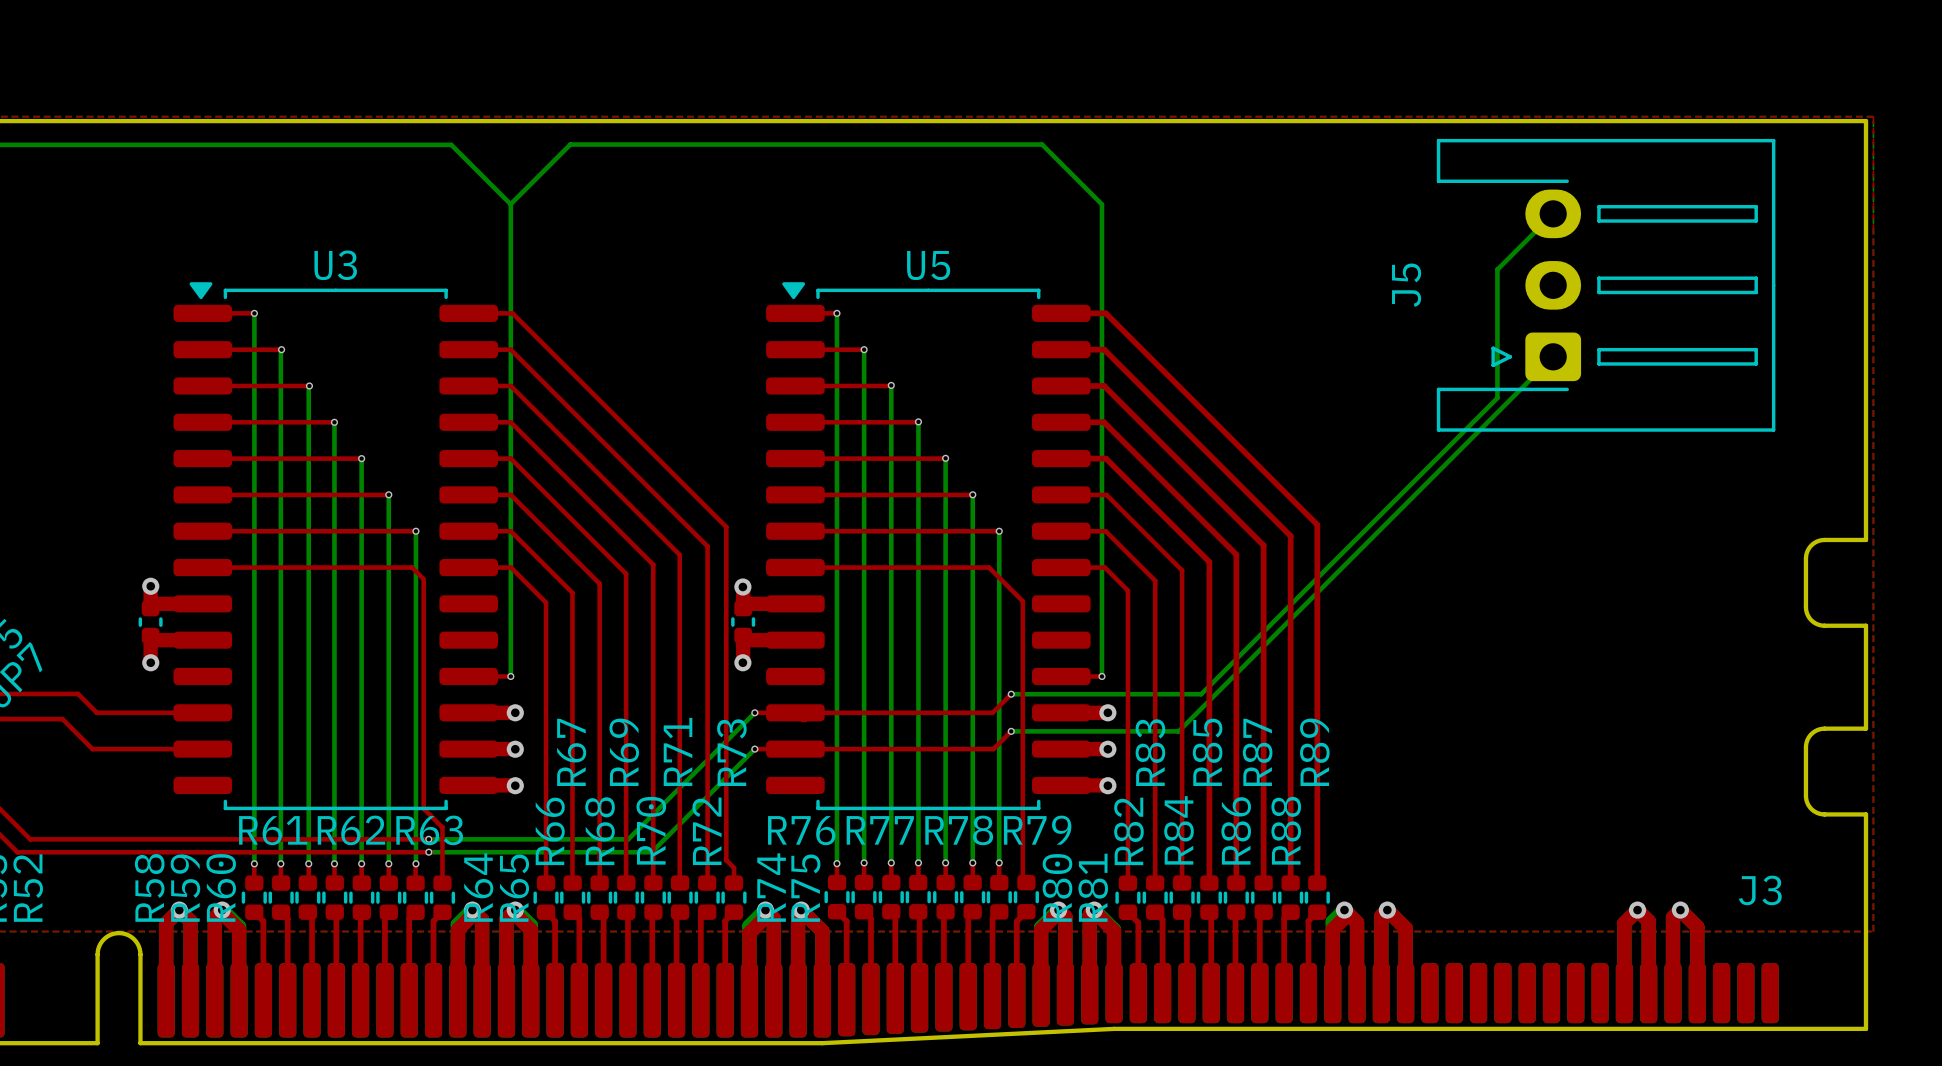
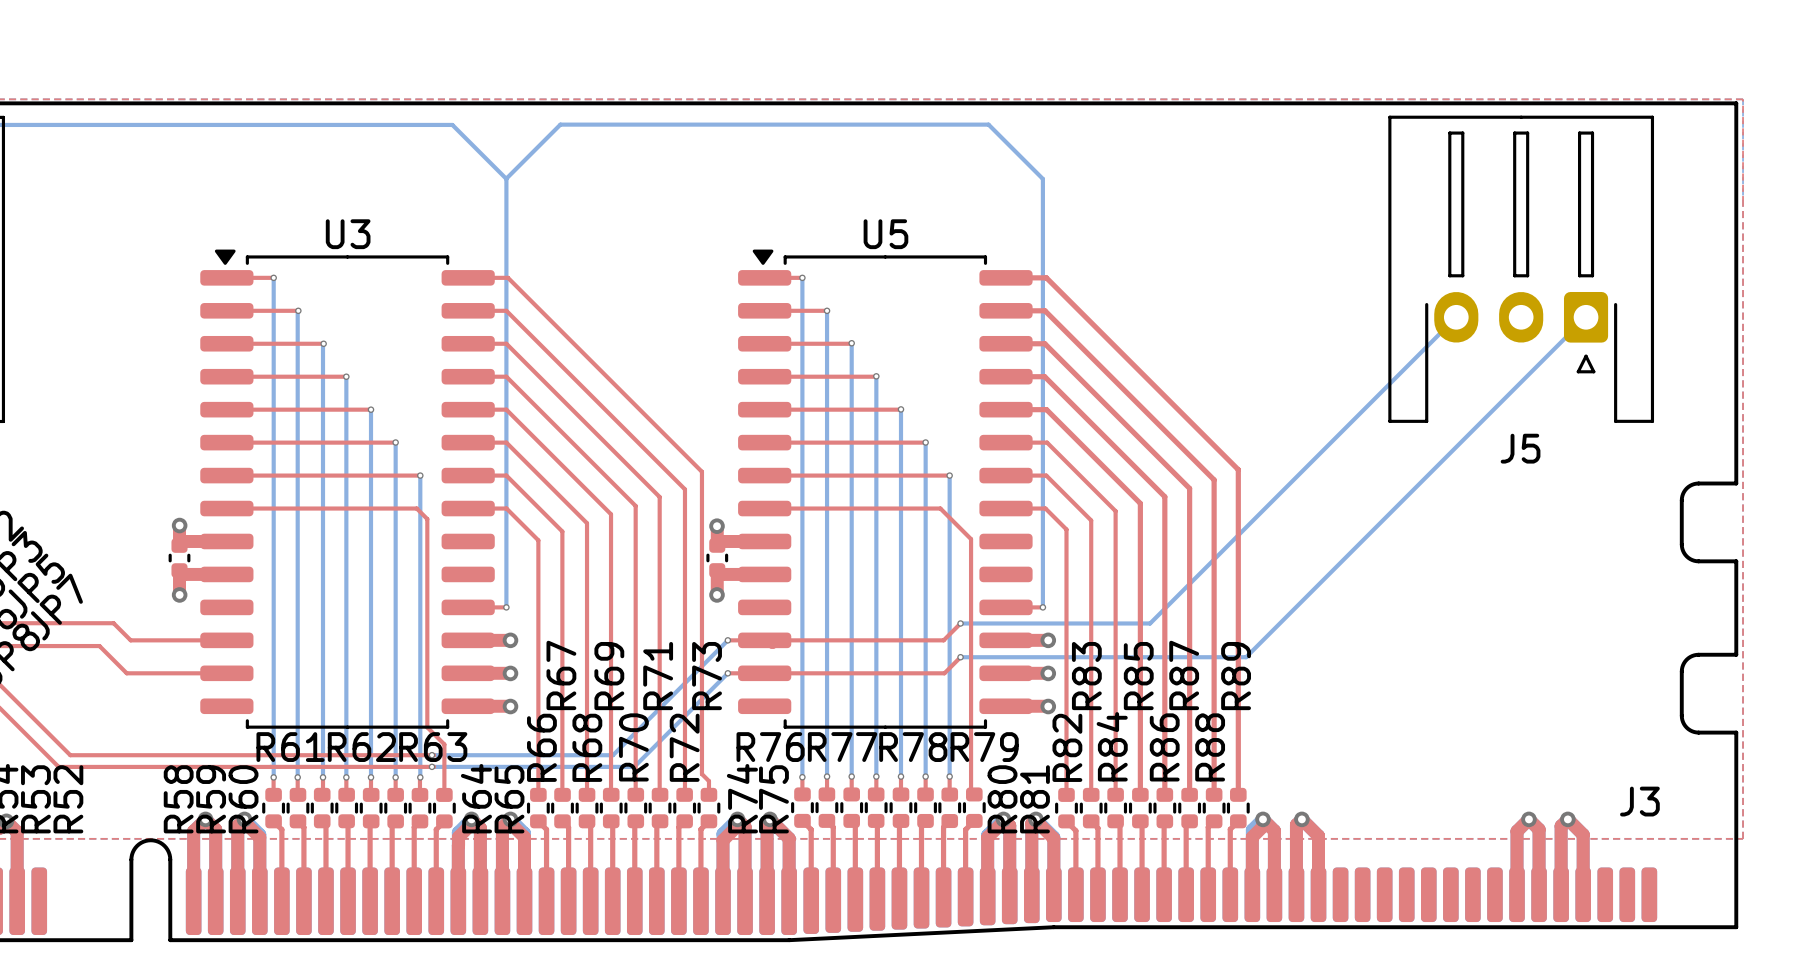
bottom track: (1553, 213) (1497, 269) (1497, 398) (1201, 694) -> (1456, 317) (1150, 623) (1133, 623)
J5 rotation: 0° (1606, 285) -> 90° counterclockwise (1521, 269)
bottom track: (1553, 356) (1178, 731) -> (1586, 317) (1246, 657) (1112, 657)

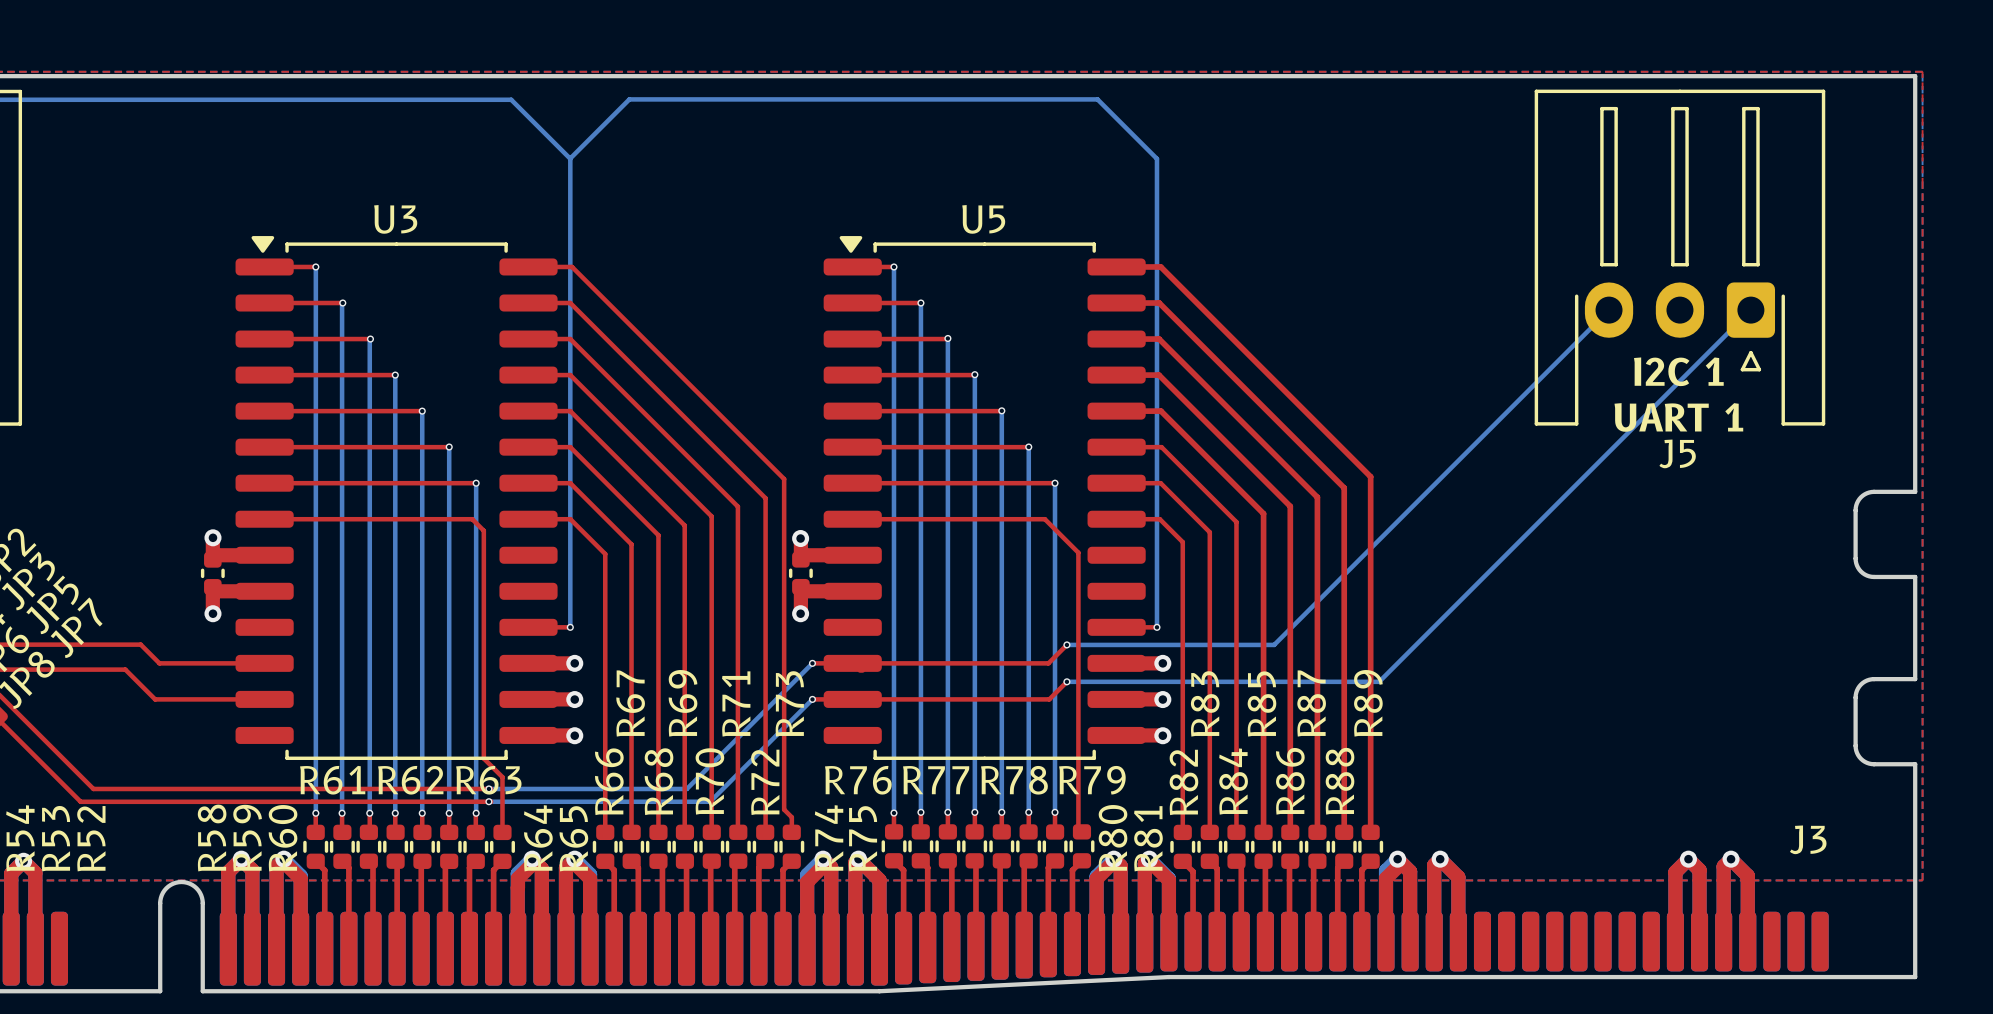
text: none -> I2C 1 (1678, 371)
text: none -> UART 1 (1678, 417)

